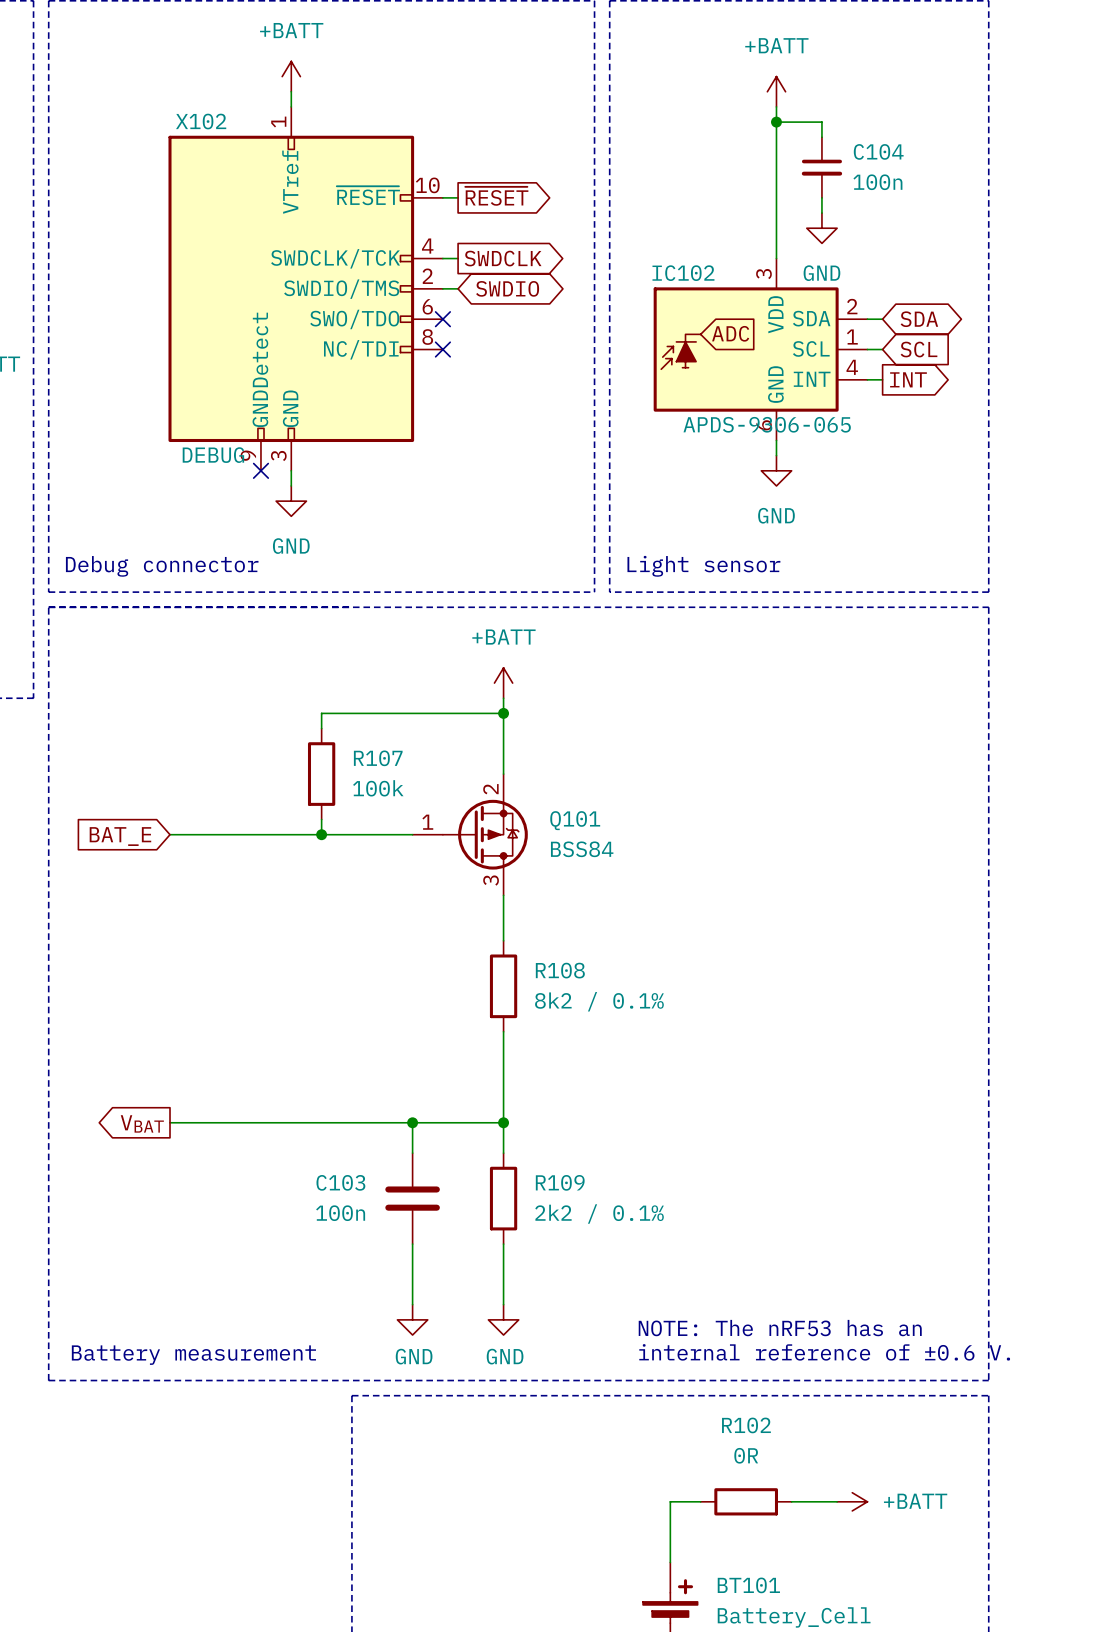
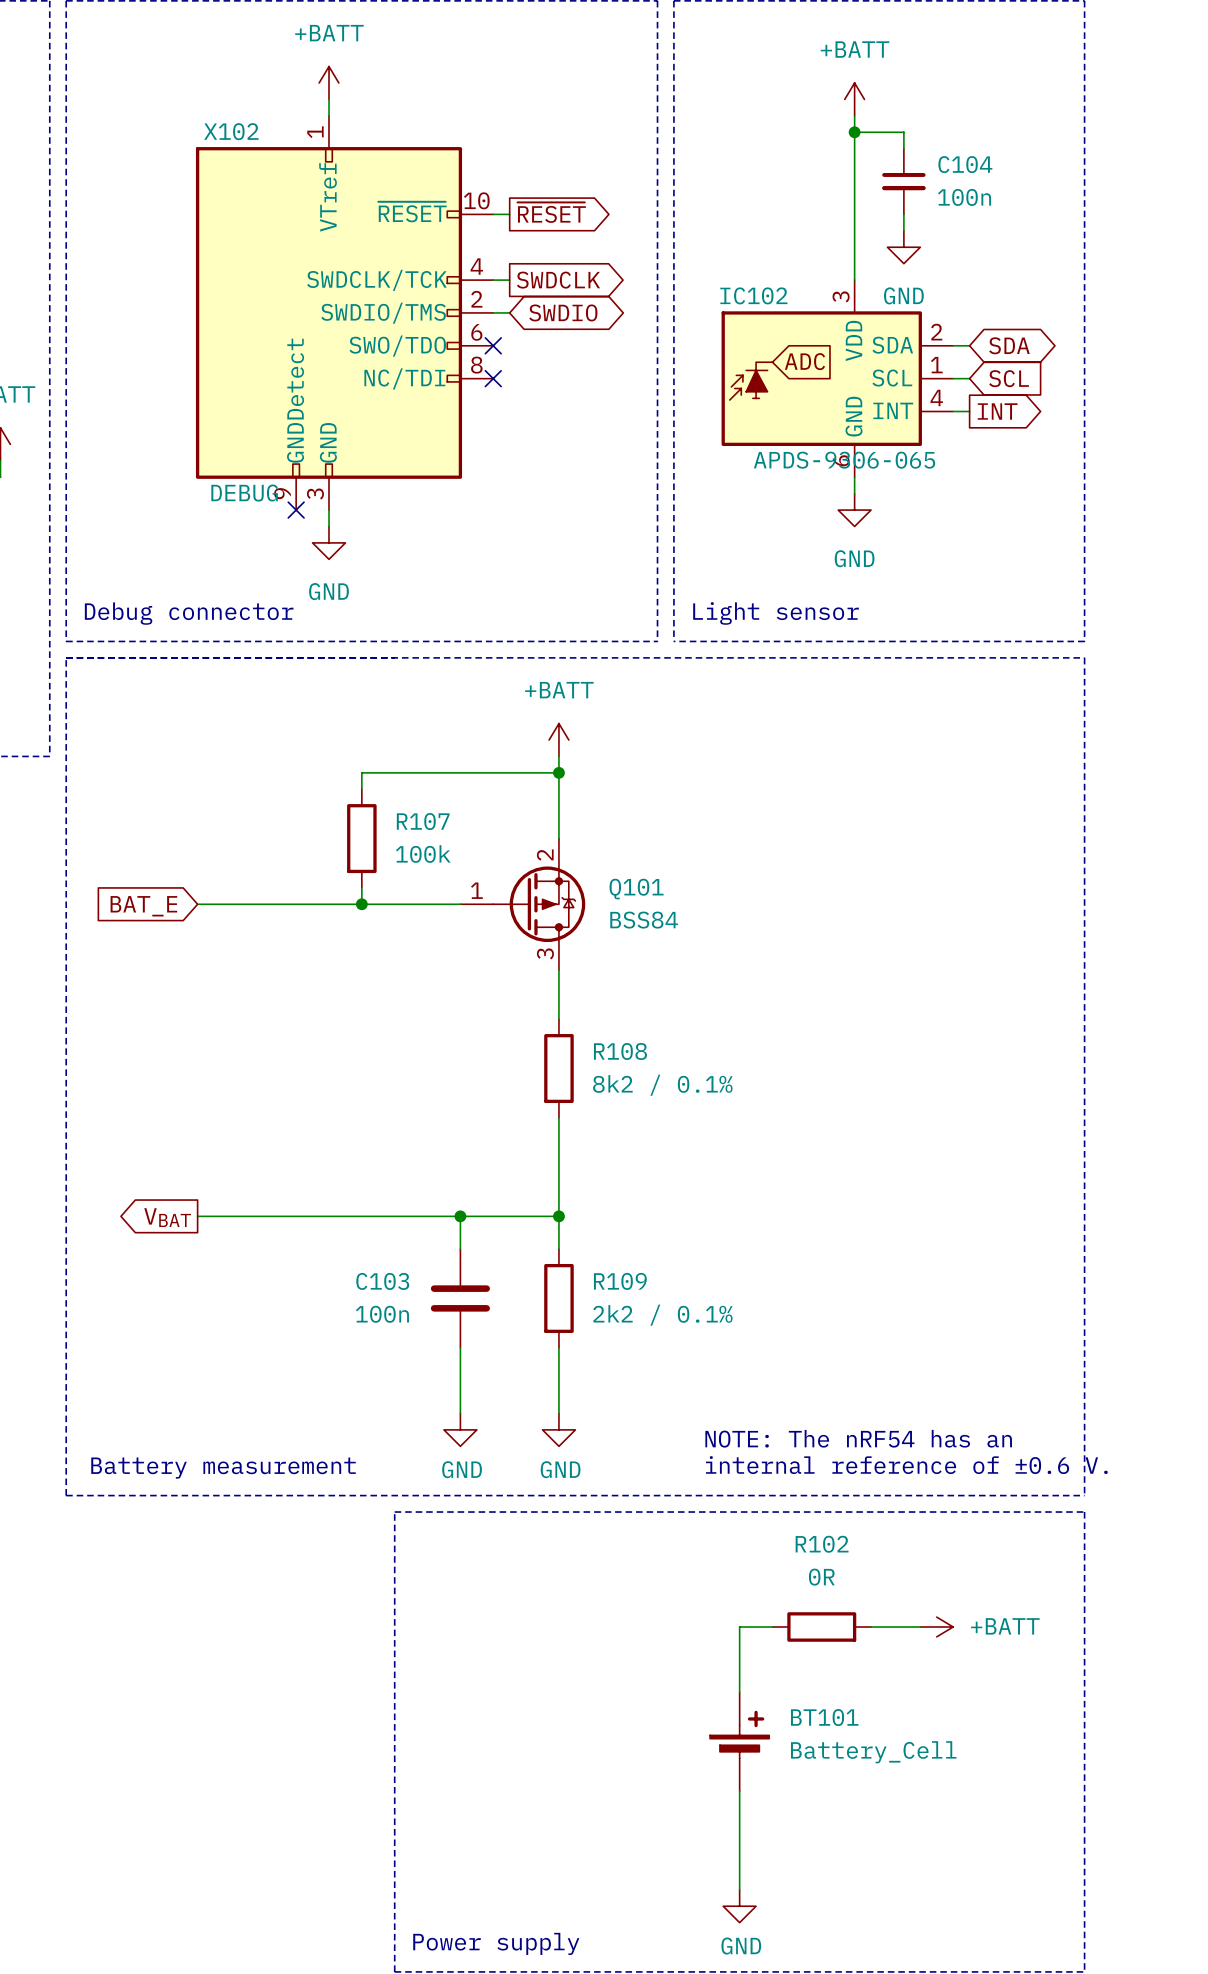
text: NOTE: The nRF53 has an (780, 1328) -> NOTE: The nRF54 has an (858, 1438)

